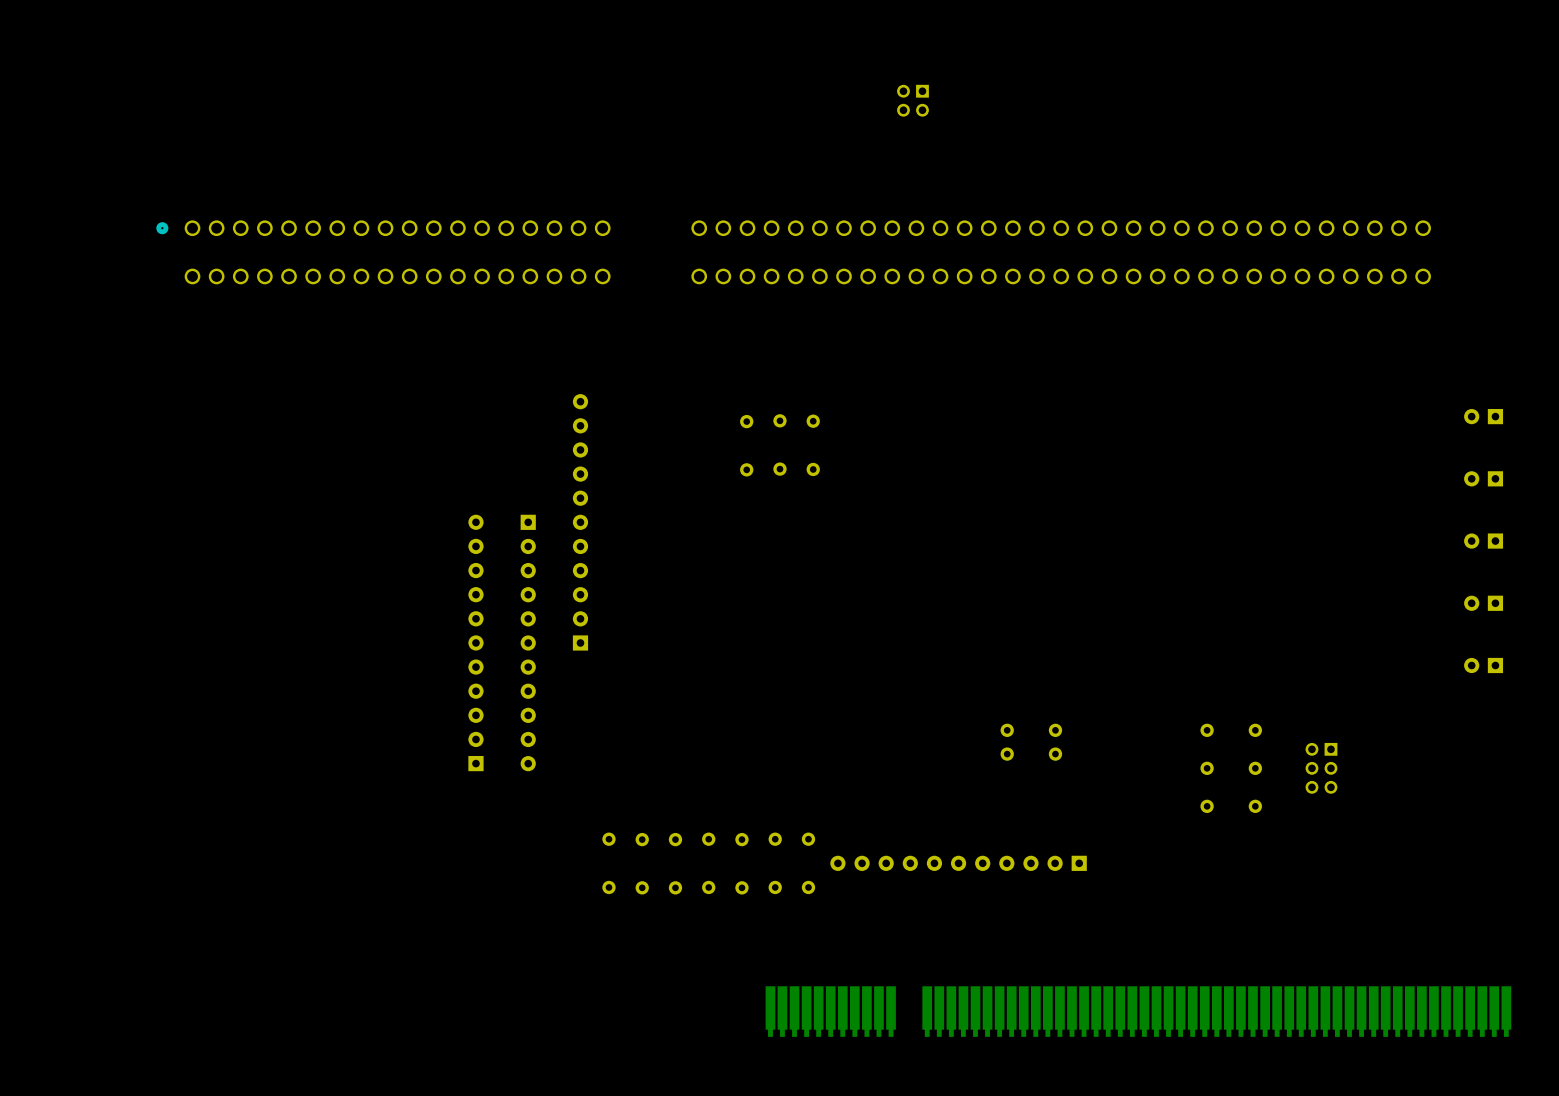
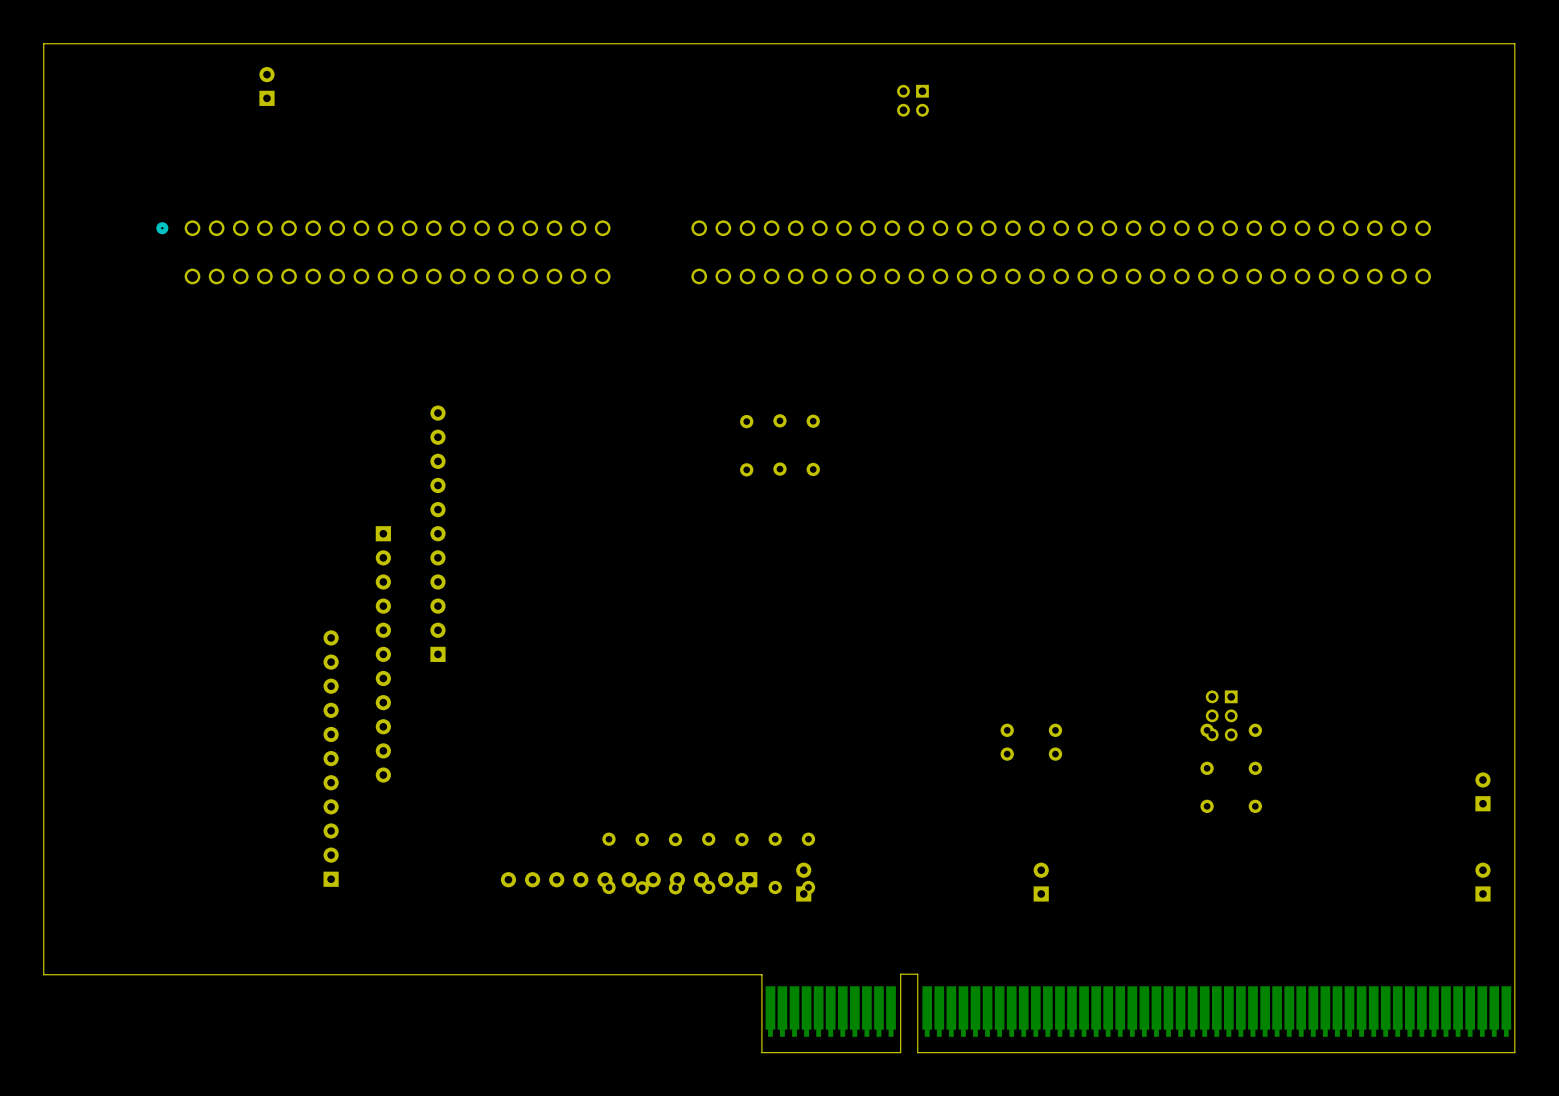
board edge: none -> (1514, 43) (43, 43) (43, 974) (761, 974) (761, 1052) (900, 1052) (900, 974) (917, 974) (917, 1052) (1514, 1052) (1514, 43)
part: none -> (266, 86)
part: (1483, 416) -> none
part: (1483, 478) -> none
part: (580, 522) -> none
part: none -> (437, 533)
part: (1483, 541) -> none
part: (1483, 603) -> none
part: (475, 642) -> none
part: (528, 642) -> none
part: none -> (383, 654)
part: (1483, 665) -> none
part: none -> (331, 758)
part position: (1321, 768) -> (1221, 715)
part: none -> (1482, 791)
part: (958, 863) -> none
part: none -> (629, 879)
part: none -> (803, 882)
part: none -> (1041, 882)
part: none -> (1482, 882)

